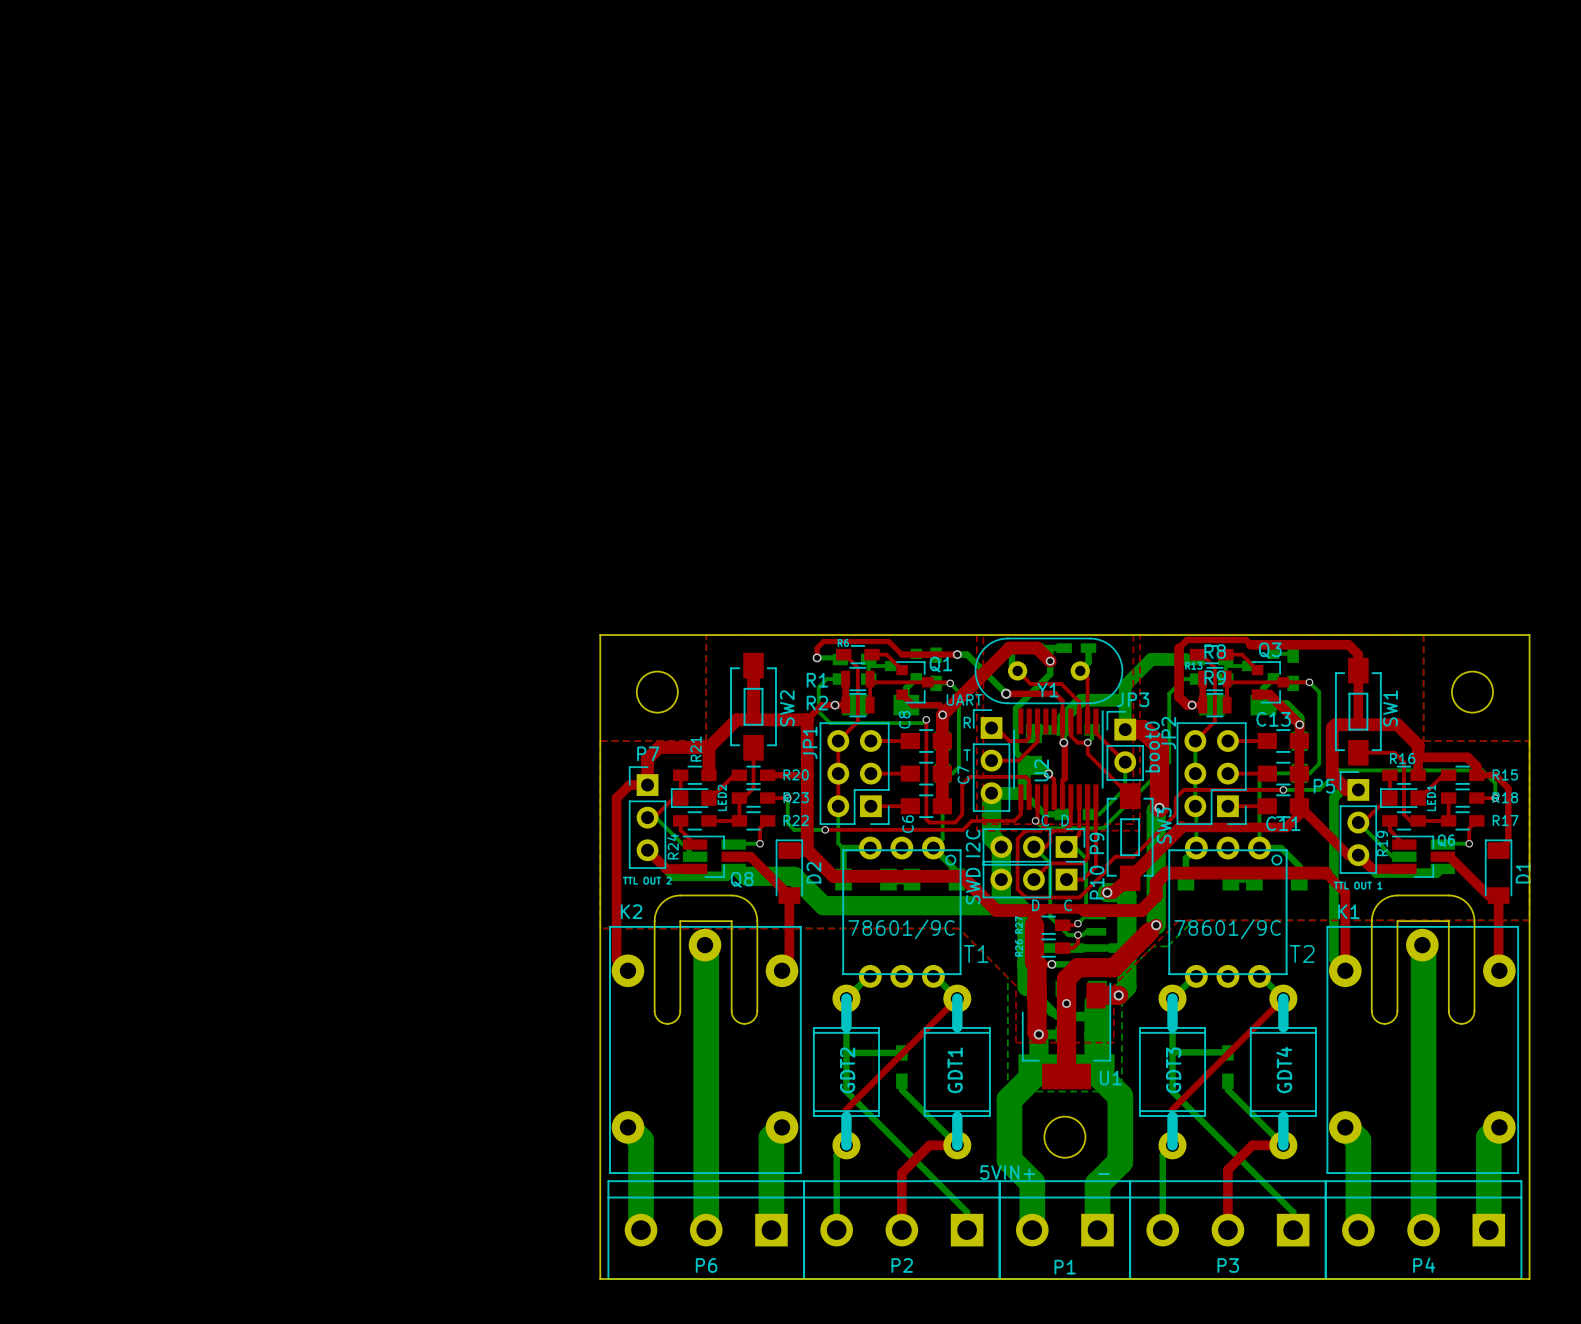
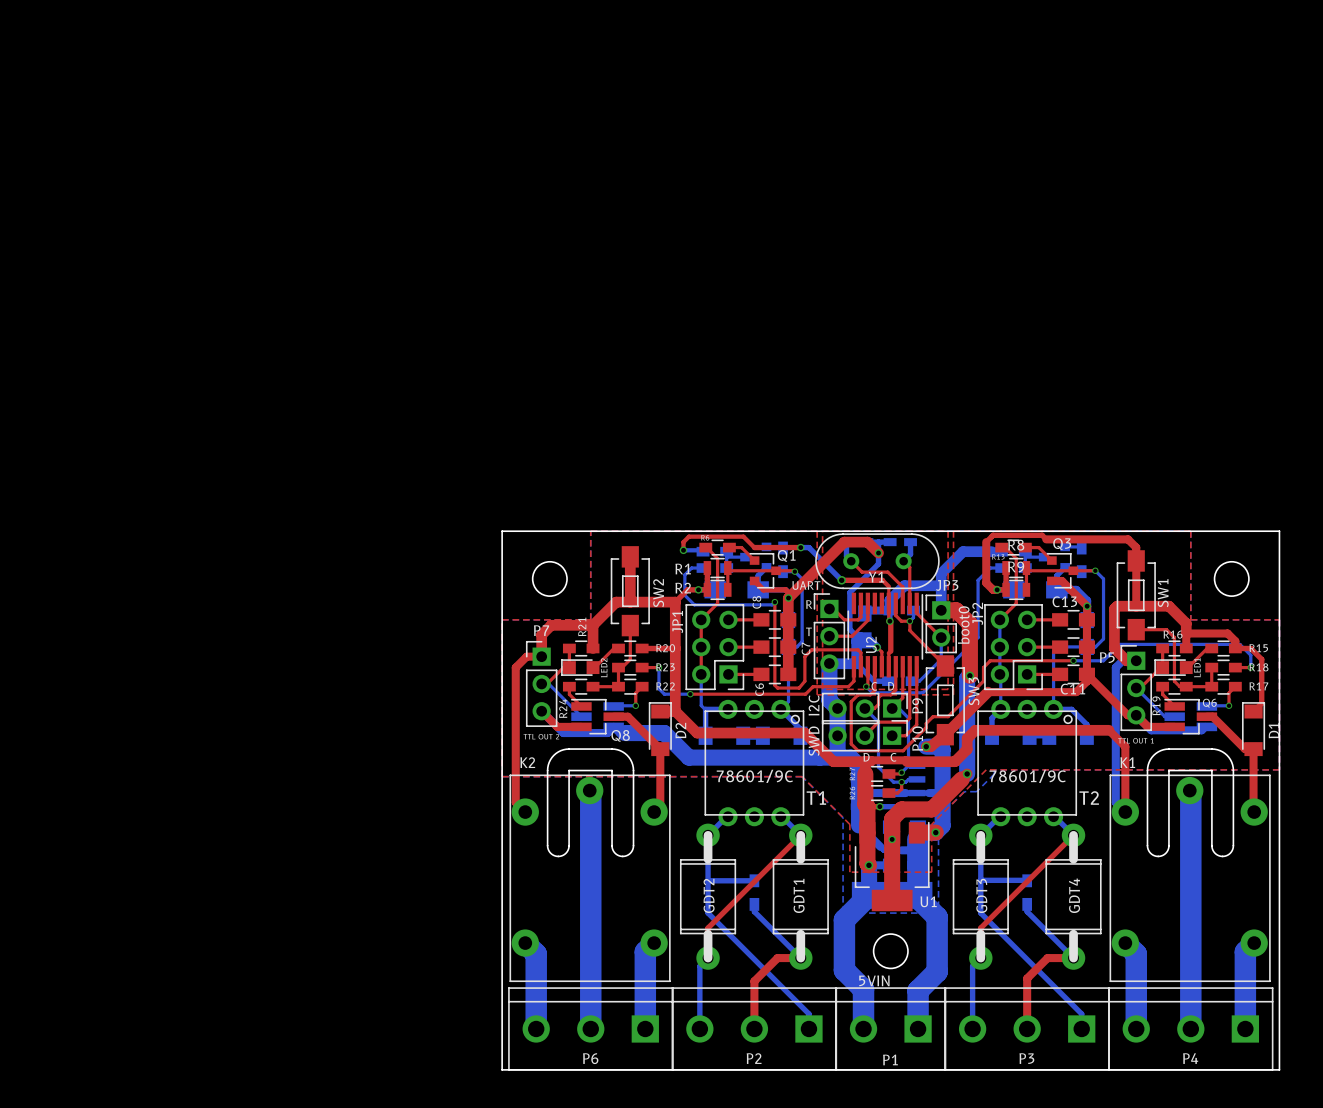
P1 value: 5VIN+ - (1045, 1172) -> 5VIN (874, 980)

